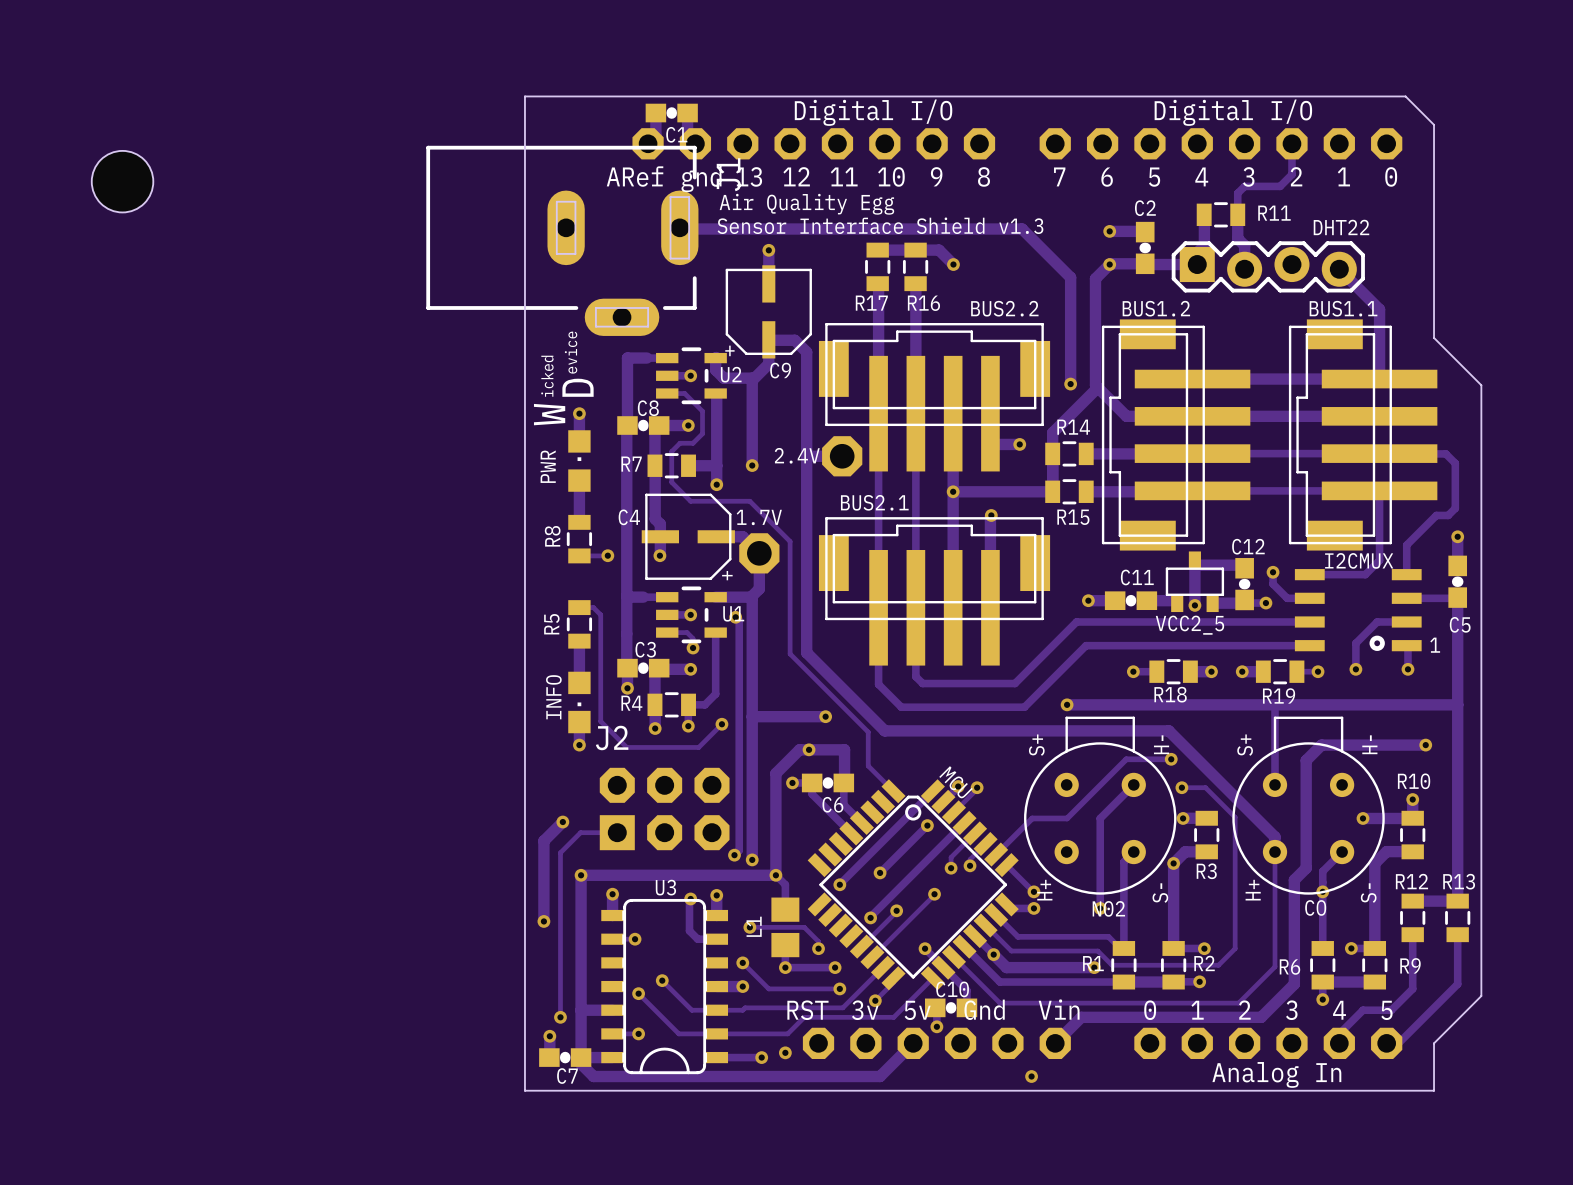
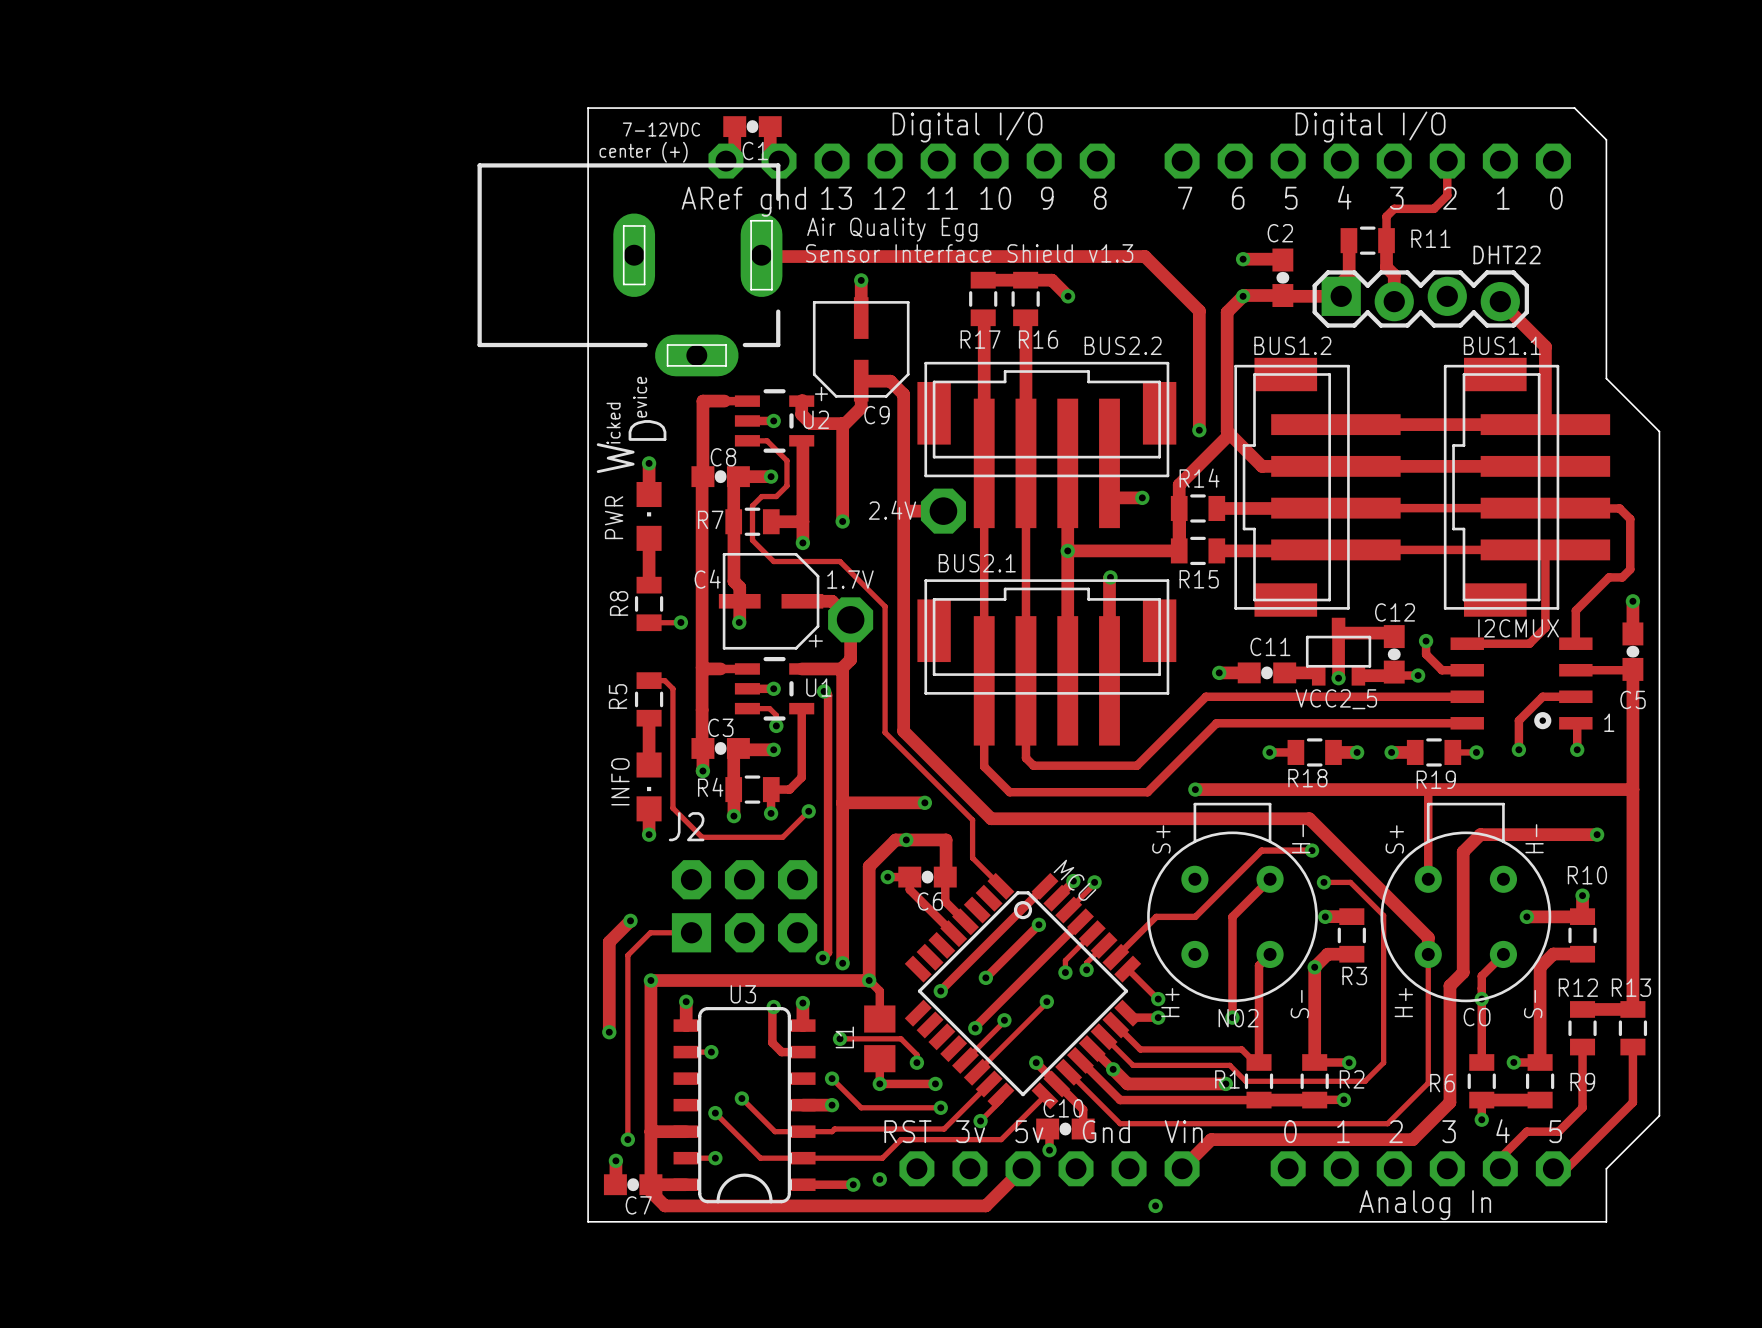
text: none -> center (+) (643, 152)
J1 name: J1 (728, 174) -> 7-12VDC (661, 129)
part: (122, 181) -> none

